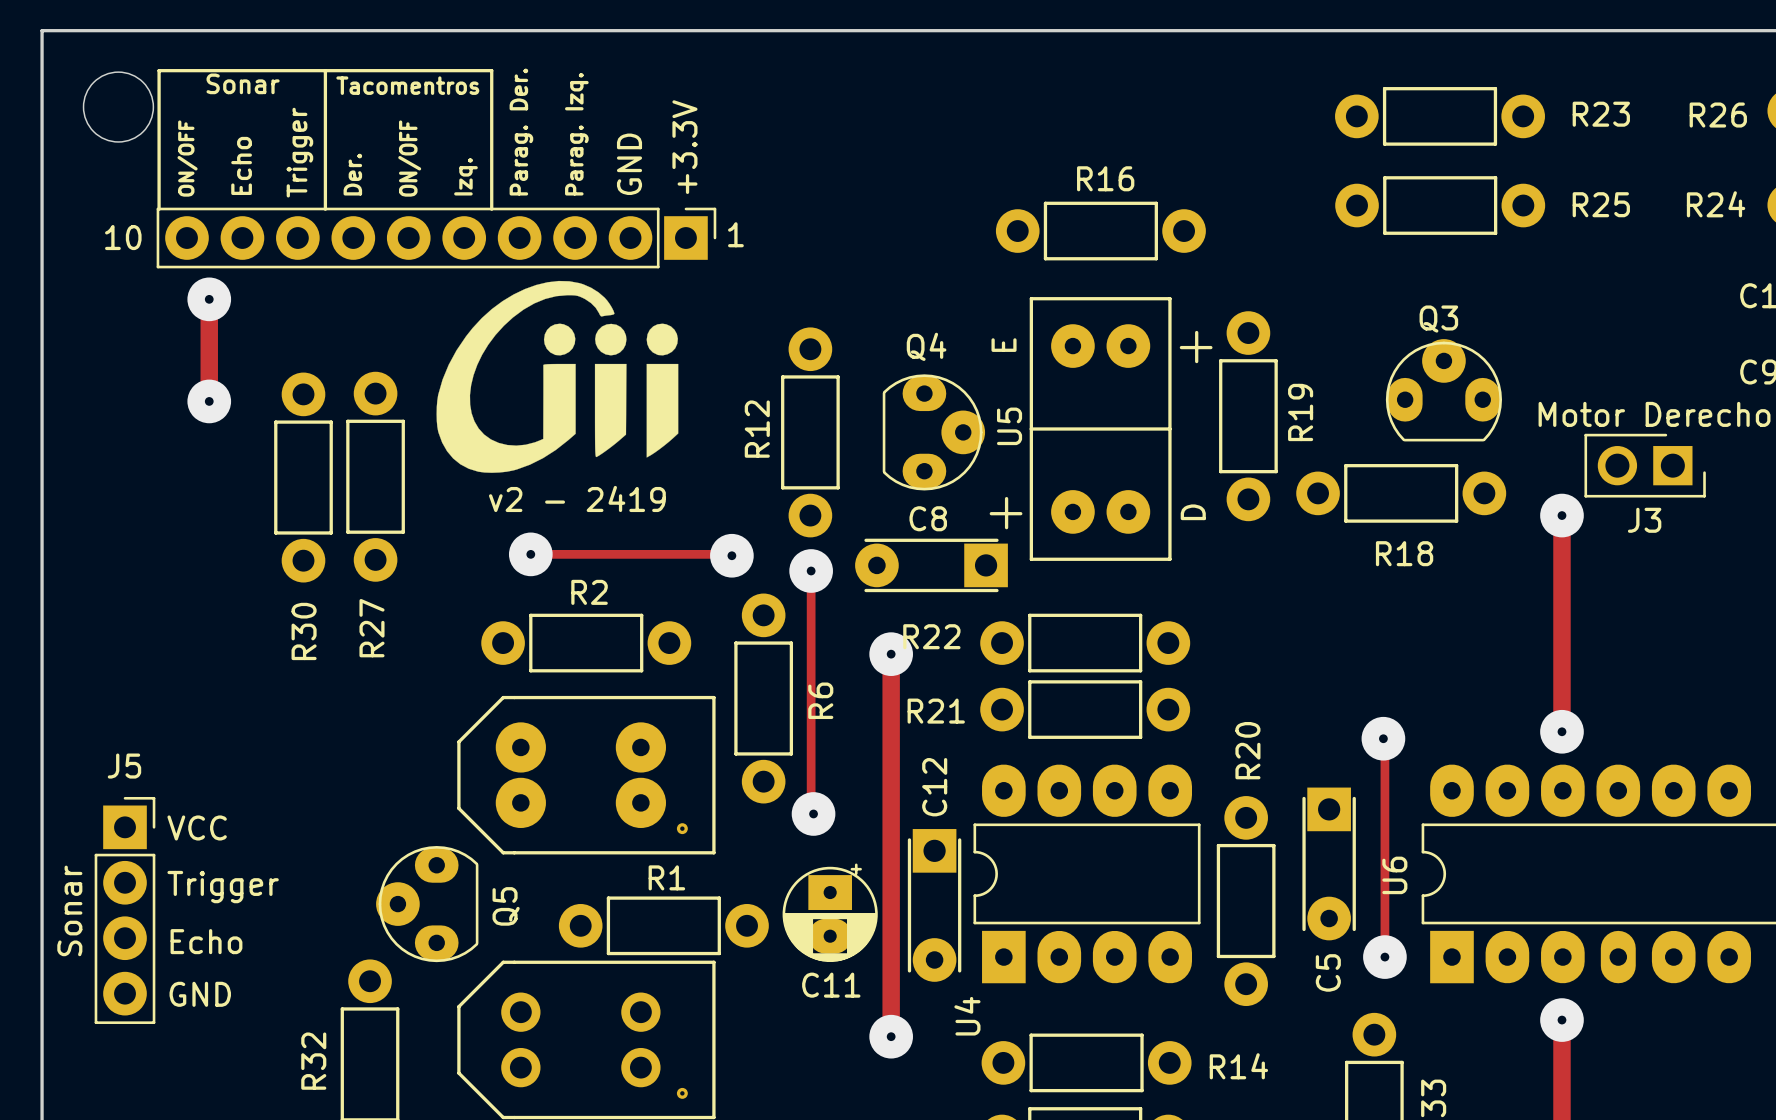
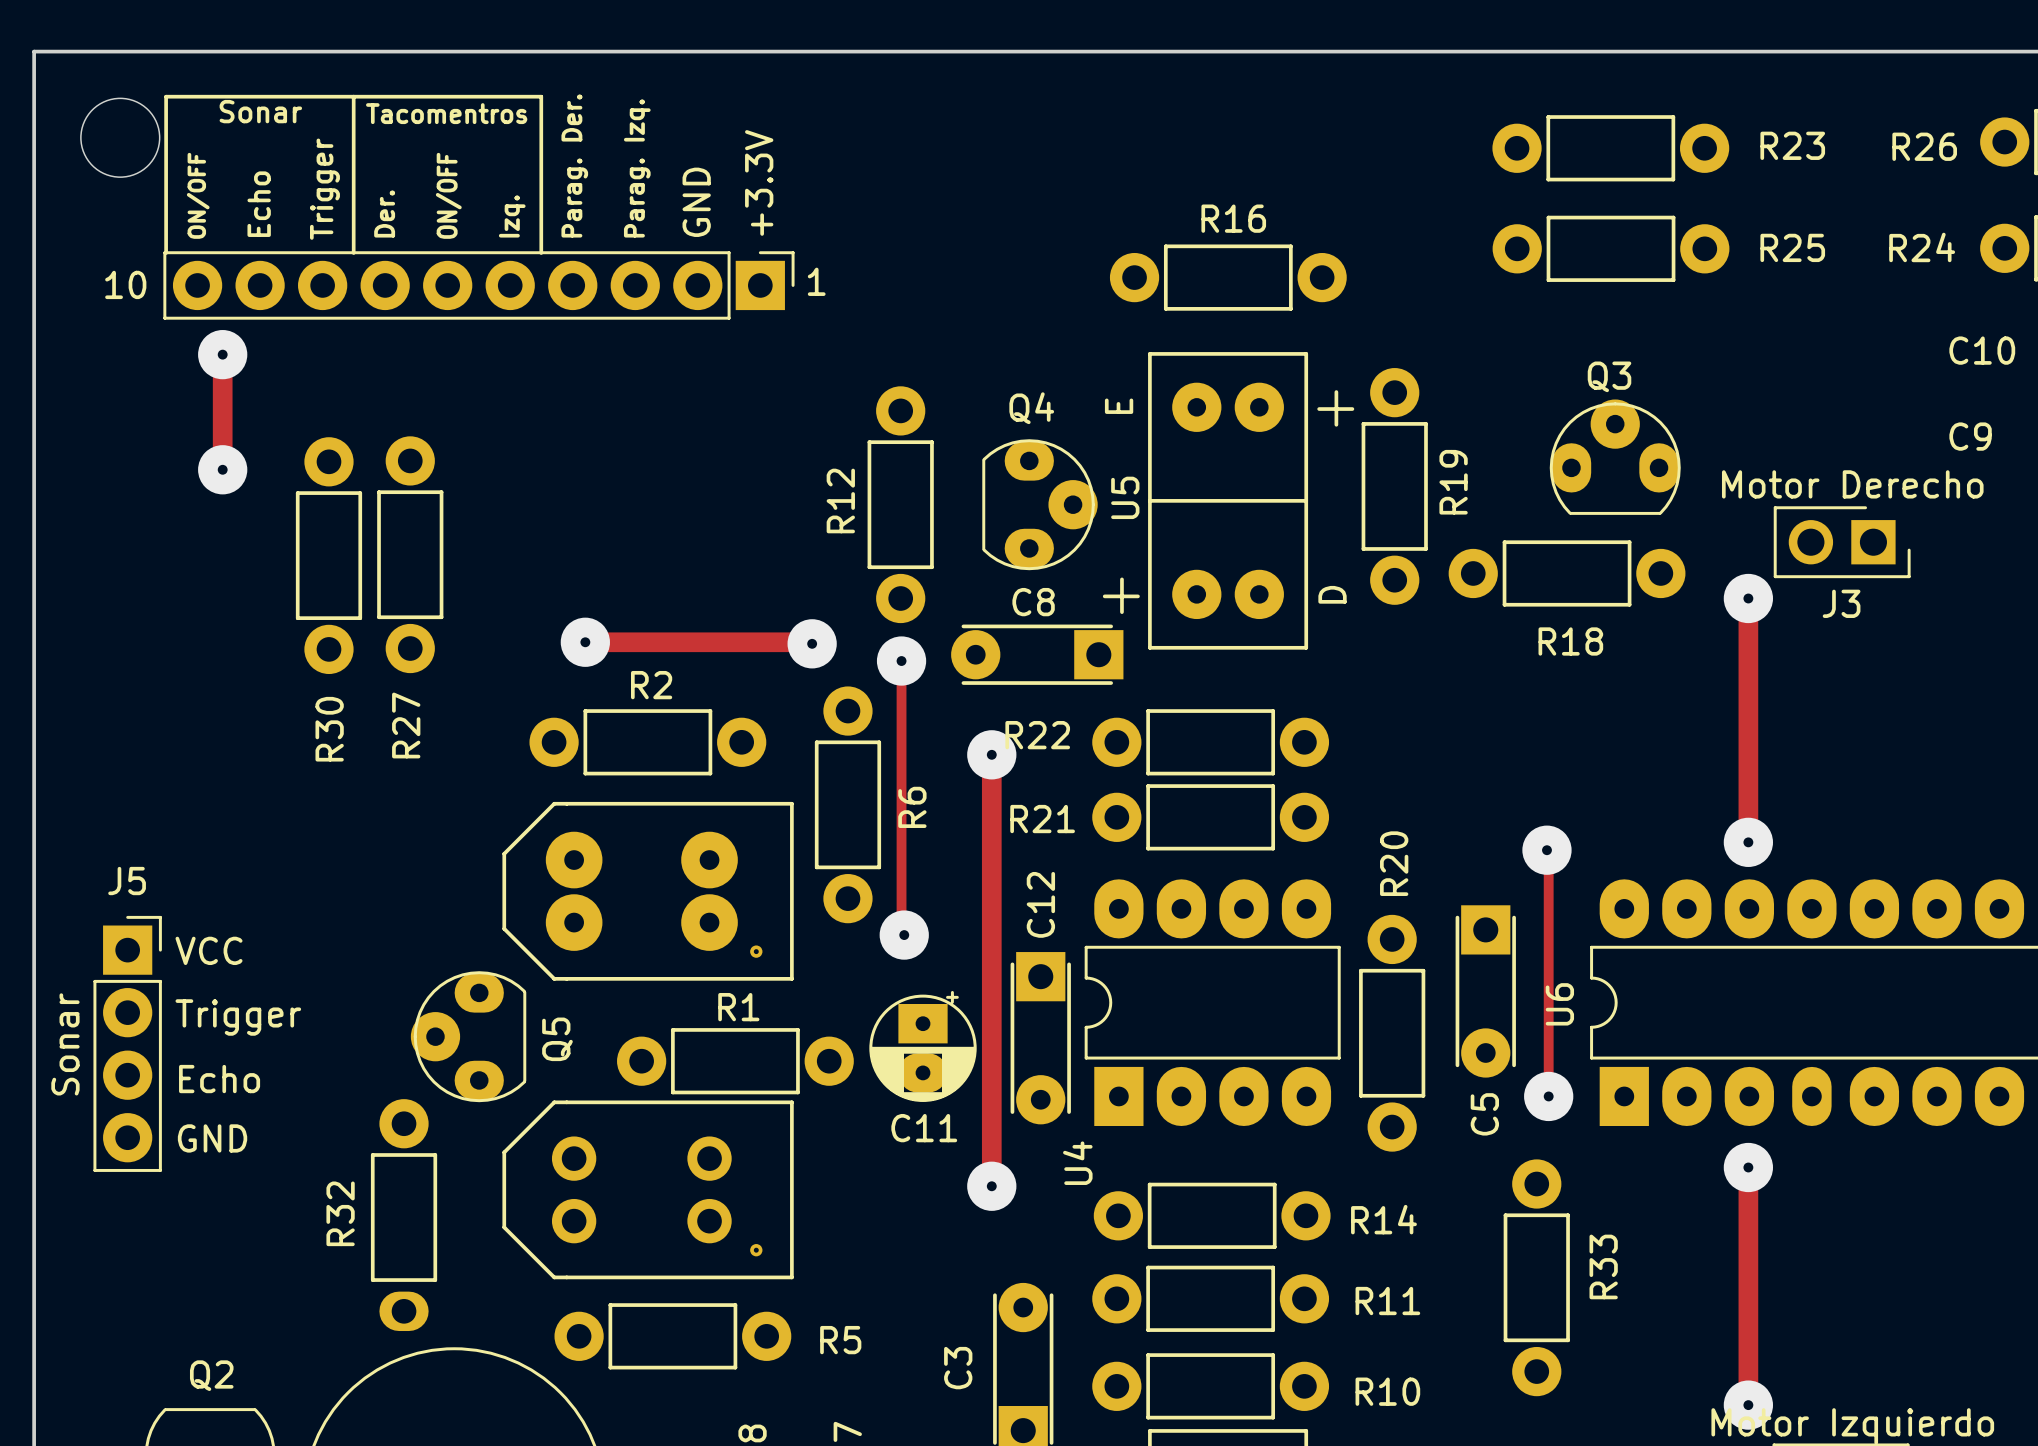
drawing: [436, 280, 679, 473] -> none
text: v2 - 2419 (577, 498) -> none
track width: thin (530, 554) (731, 555) -> thick (585, 642) (810, 642) (812, 643)

